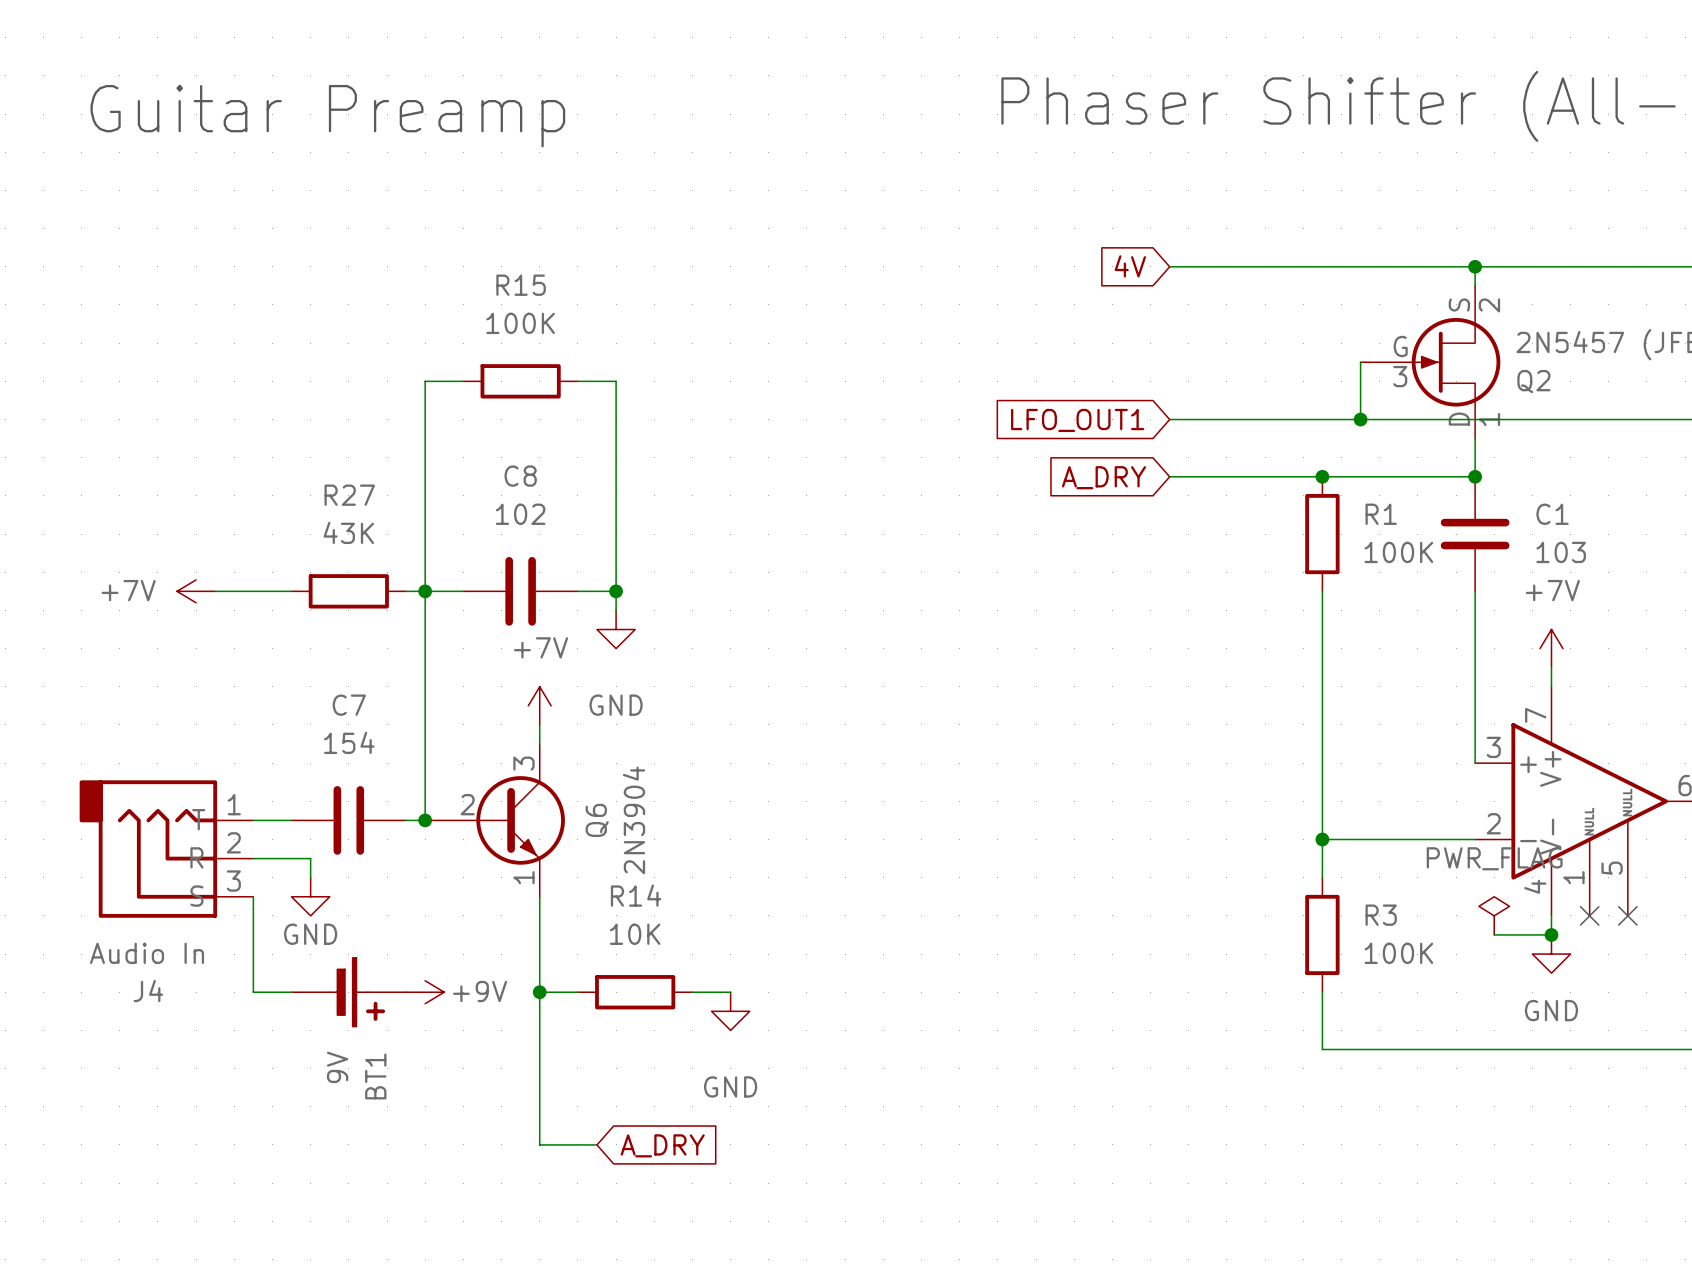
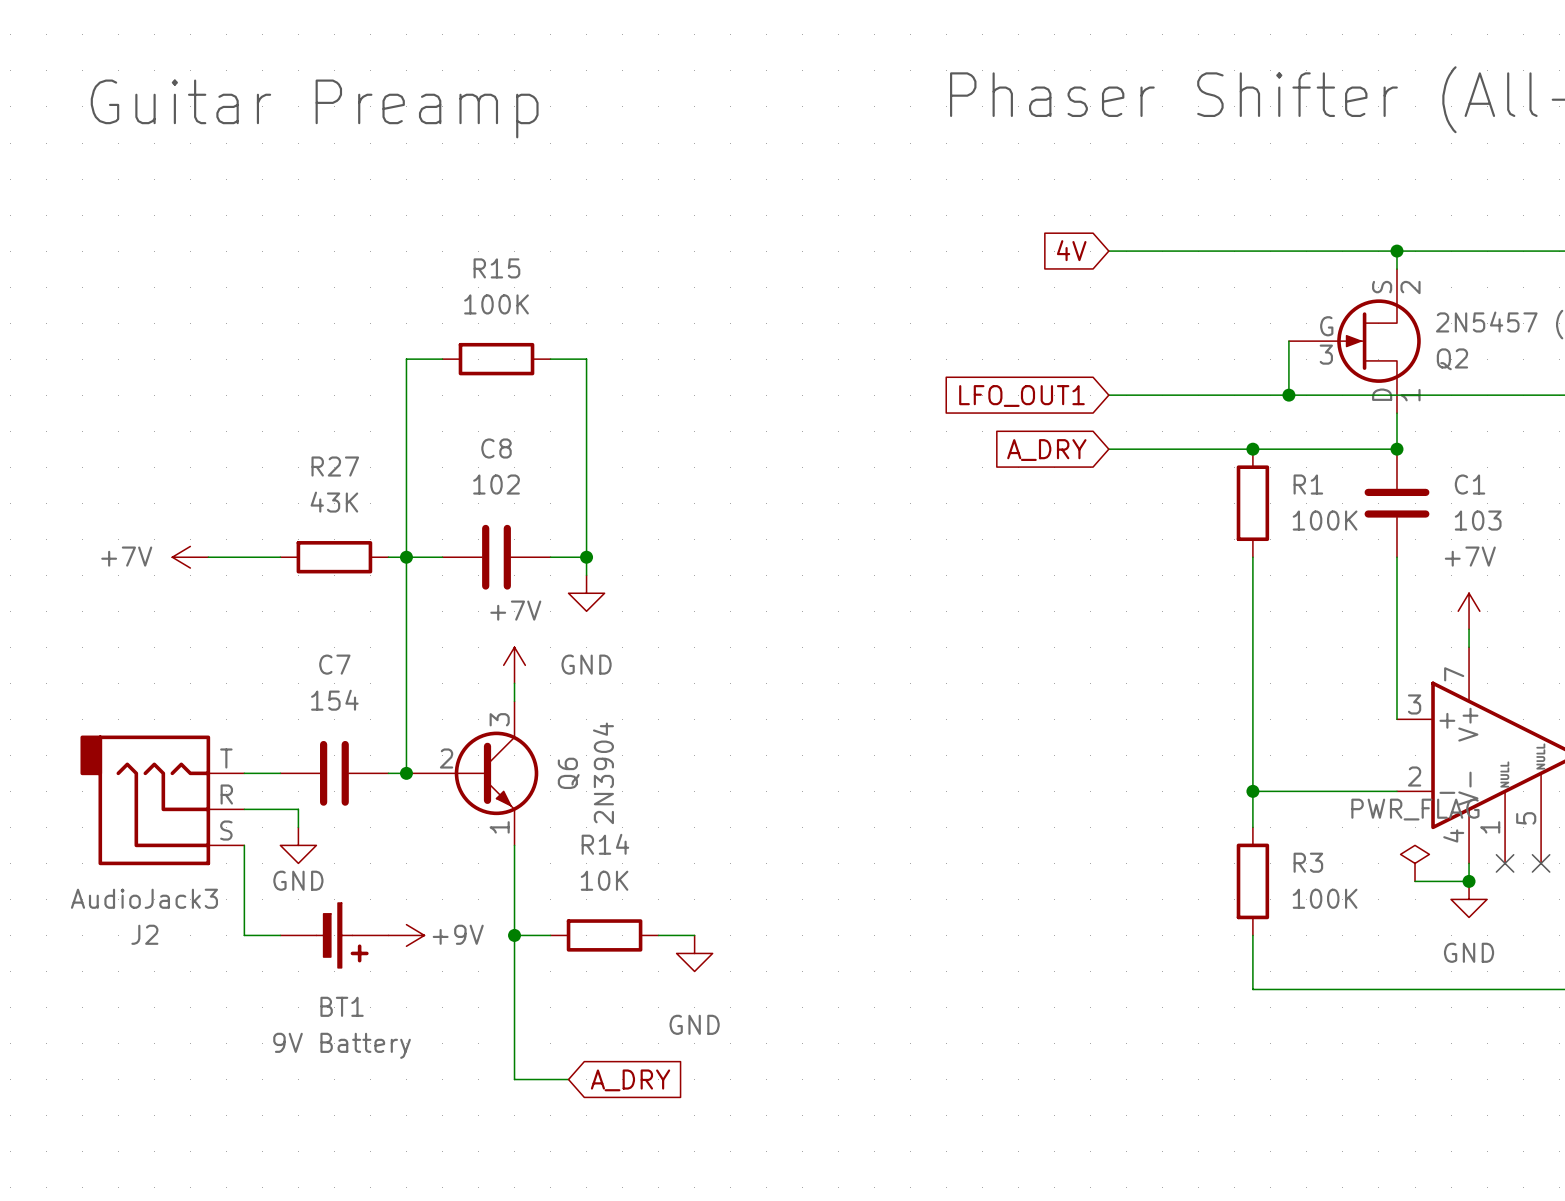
J4 pin number: 1 (234, 804) -> T (226, 758)
J4 pin name: T (198, 819) -> none
J4 pin number: 2 (233, 842) -> R (226, 794)
J4 pin name: R (196, 857) -> none
J4 pin number: 3 (233, 881) -> S (226, 830)
J4 pin name: S (196, 896) -> none
J4 value: Audio In (147, 953) -> AudioJack3 (144, 898)
J4 name: J4 (148, 991) -> J2 (144, 934)
BT1 value: 9V (337, 1067) -> 9V Battery (342, 1045)
BT1 name rotation: 0° (375, 1076) -> 90° clockwise (342, 1006)

